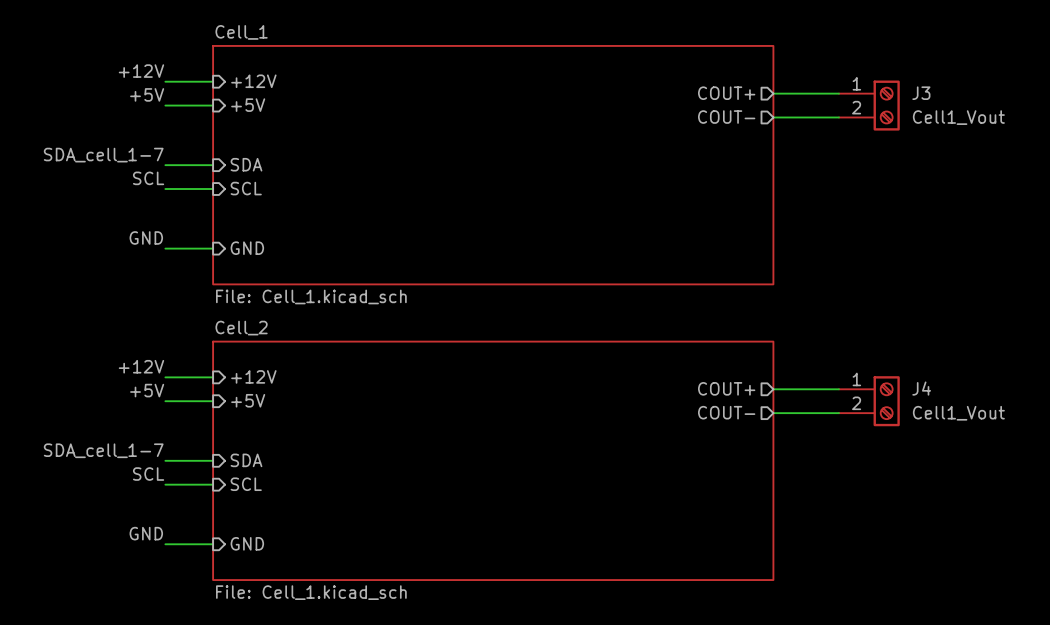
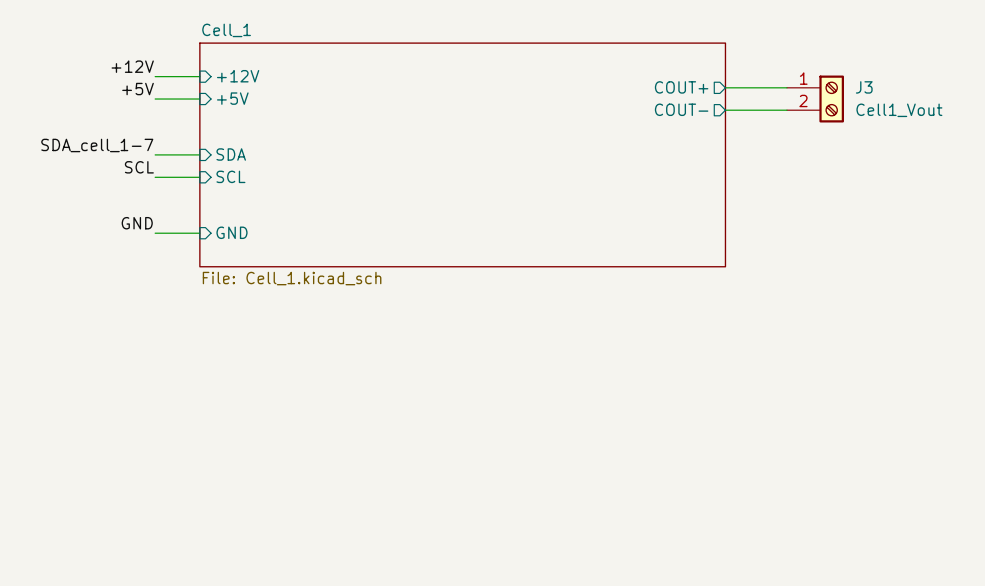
label: +12V (141, 366) -> none
sheet pin: +12V (253, 376) -> none
wire: (165, 377) (213, 377) -> none
sheet pin: COUT+ (726, 388) -> none
wire: (773, 389) (838, 389) -> none
label: +5V (147, 390) -> none
sheet pin: +5V (248, 400) -> none
wire: (165, 401) (213, 401) -> none
J4: Cell1_Vout (869, 401) -> none
sheet pin: COUT- (726, 412) -> none
wire: (773, 413) (838, 413) -> none
label: SDA_cell_1-7 (103, 450) -> none
wire: (165, 460) (213, 460) -> none
sheet pin: SDA (246, 460) -> none
sheet Cell_2: File: Cell_1.kicad_sch (493, 460) -> none
label: SCL (148, 474) -> none
wire: (165, 484) (213, 484) -> none
sheet pin: SCL (246, 484) -> none
label: GND (146, 533) -> none
sheet pin: GND (247, 543) -> none
wire: (165, 544) (213, 544) -> none

